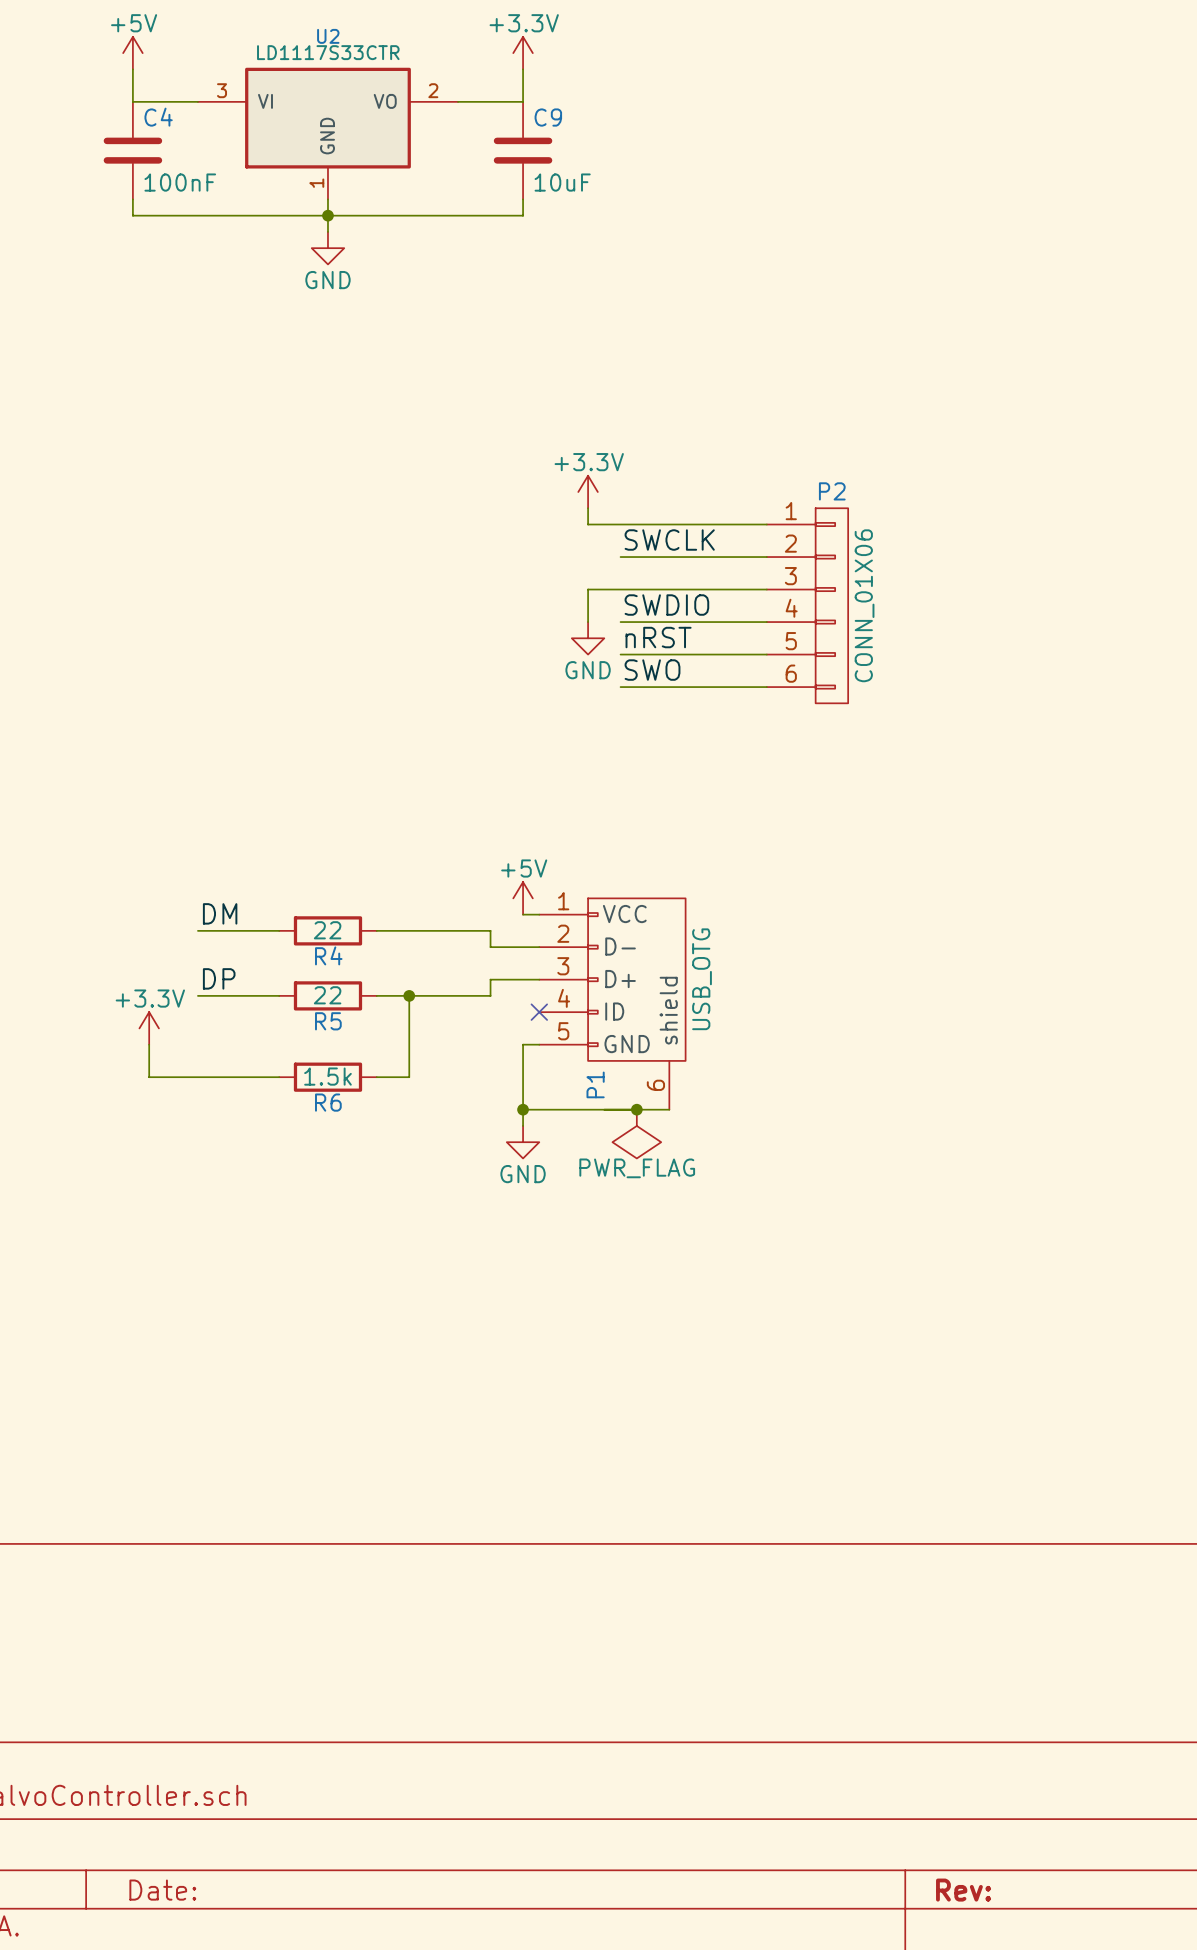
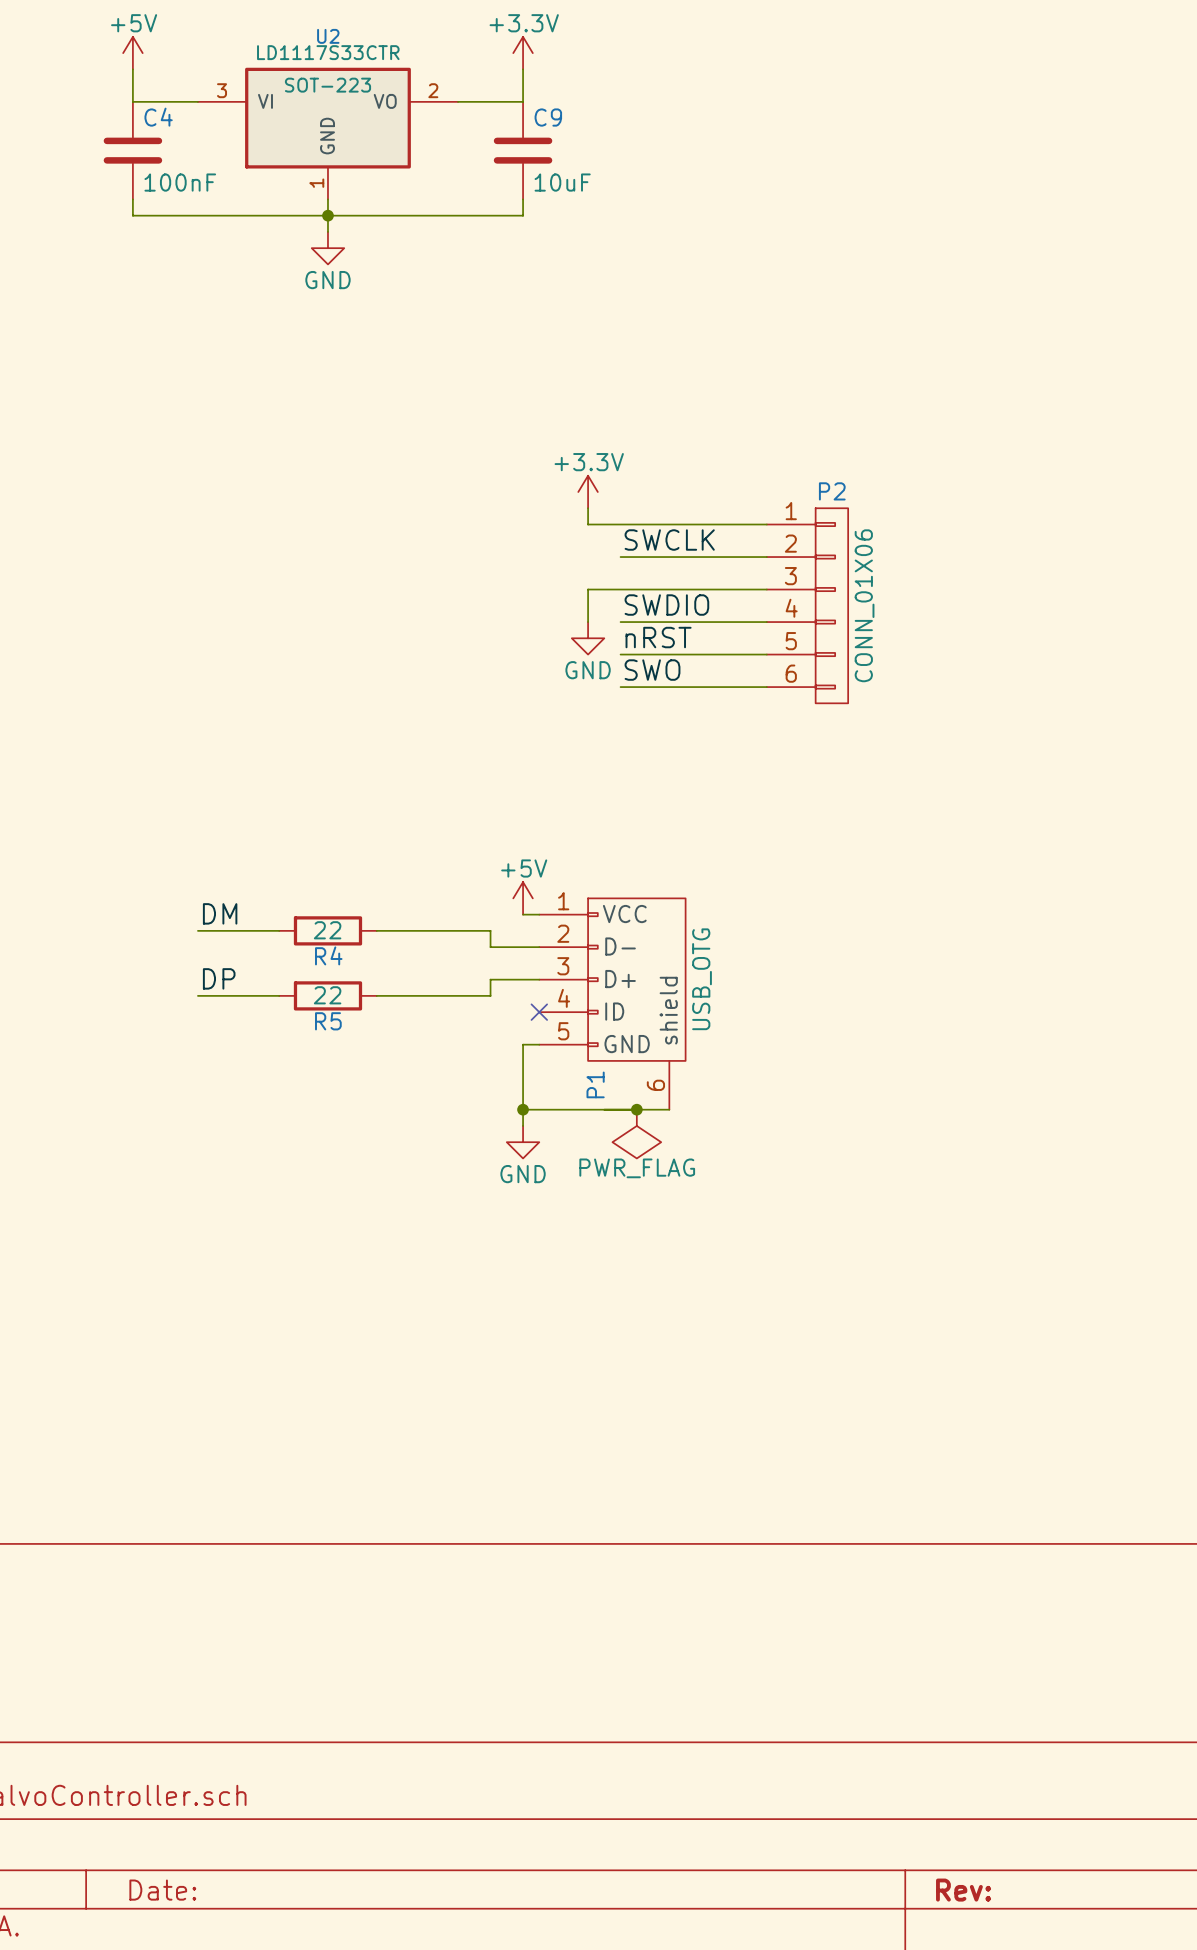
U2 text: none -> SOT-223 (327, 85)
wire: (409, 995) (409, 1077) (376, 1077) -> none
junction: (409, 995) -> none
power symbol: +3.3V (149, 1028) -> none
wire: (149, 1044) (149, 1077) (279, 1077) -> none
R6: 1.5k (327, 1077) -> none

